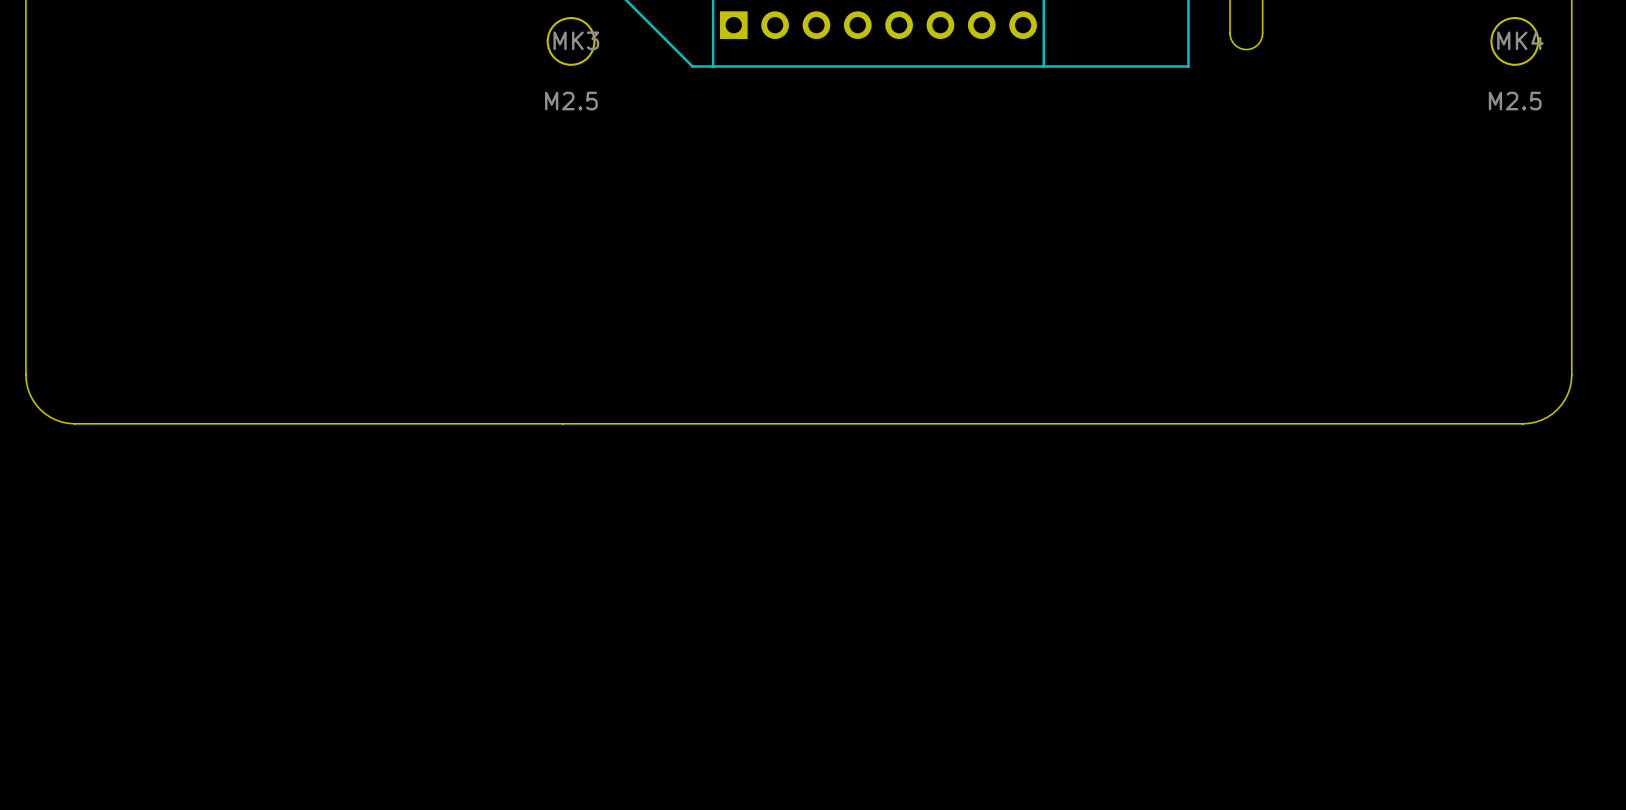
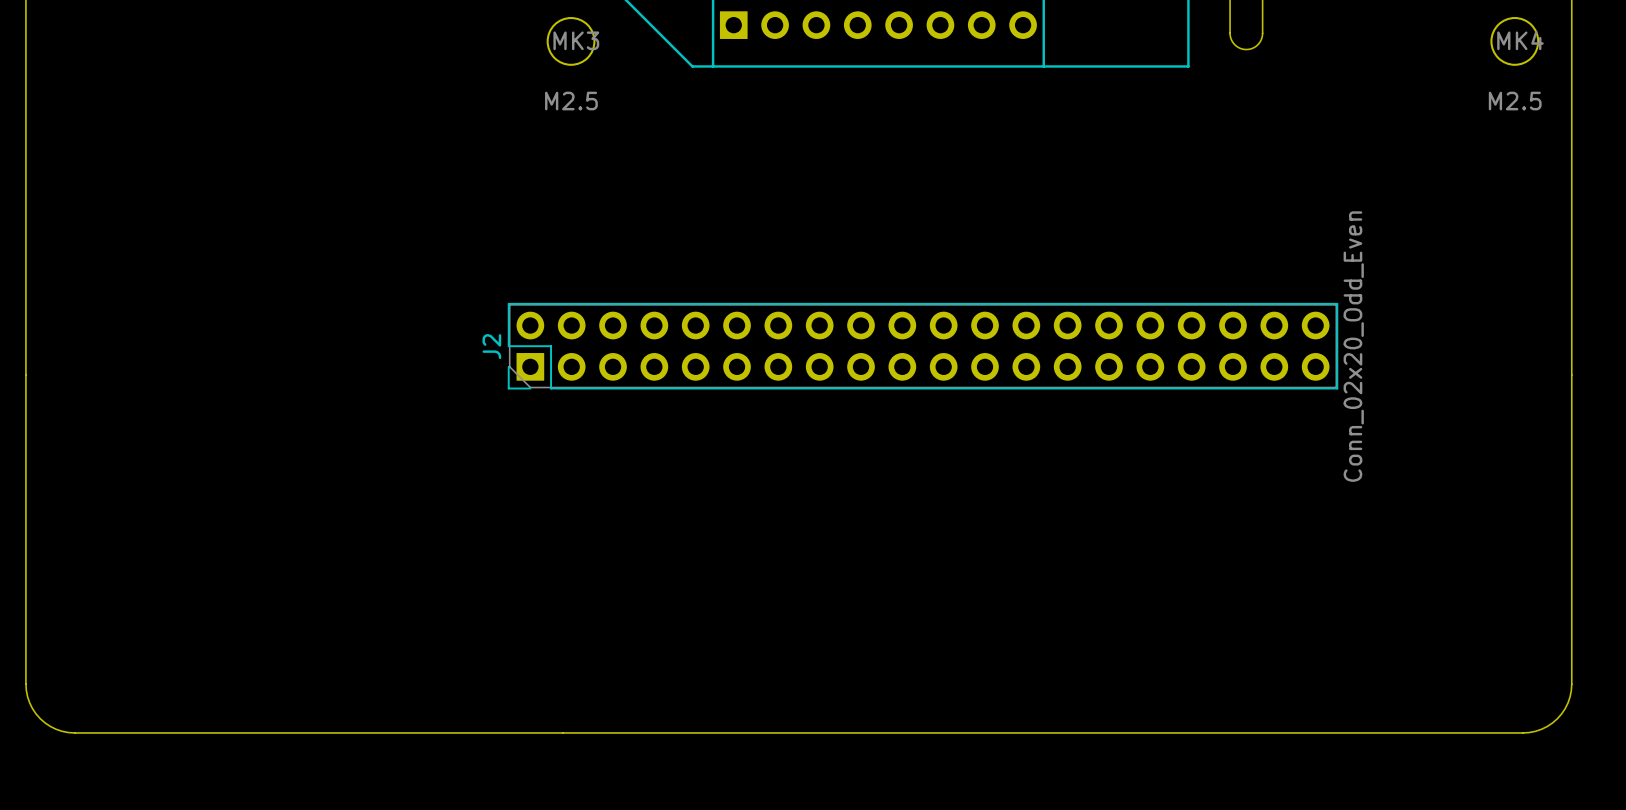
J2: none -> Conn_02x20_Odd_Even (923, 346)
board edge: (25, 374) (29, 393) (40, 409) (56, 420) (74, 423) (1522, 423) (1541, 420) (1557, 409) (1568, 393) (1571, 374) -> (25, 374) (26, 690) (32, 708) (45, 722) (56, 729) (74, 732) (1522, 732) (1535, 731) (1552, 722) (1561, 713) (1568, 702) (1571, 690) (1571, 374)

